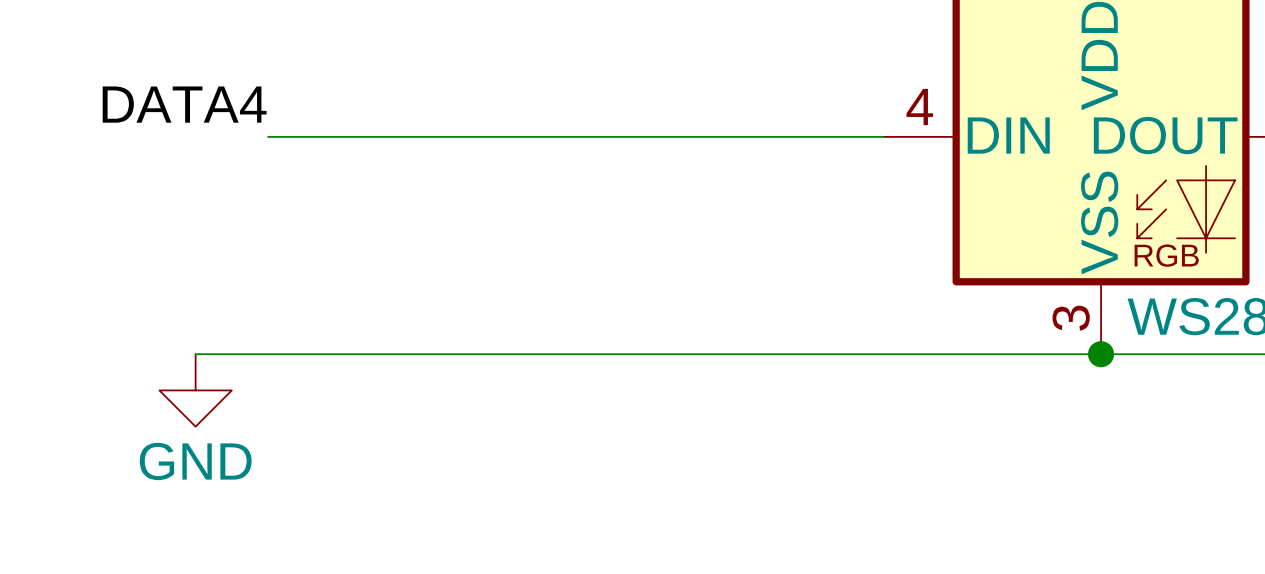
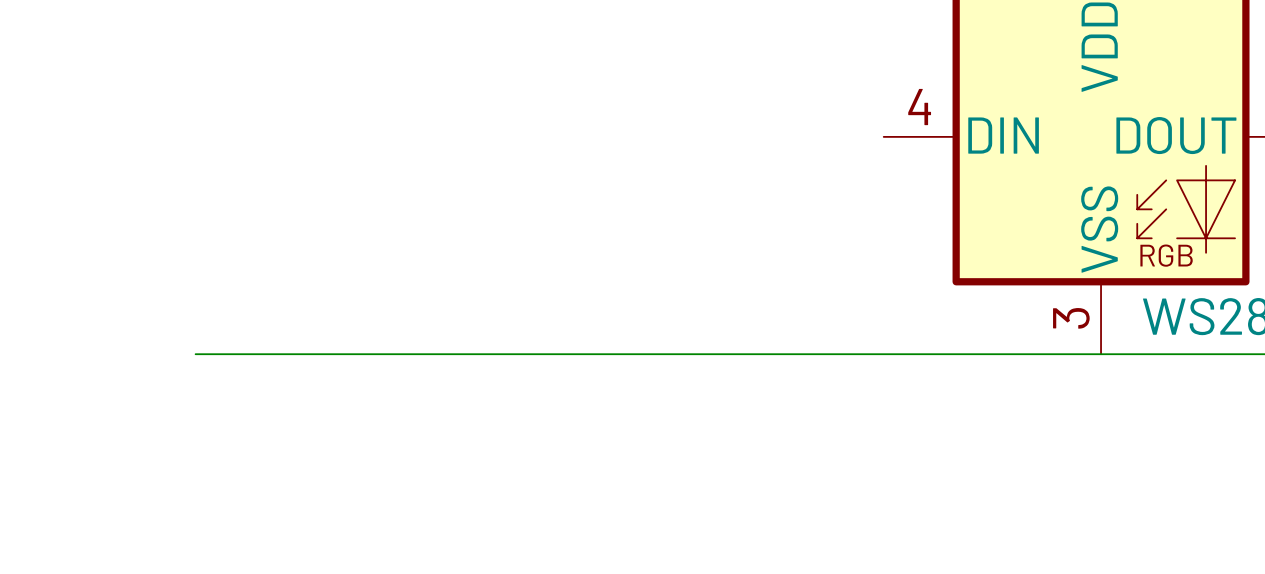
label: DATA4 (184, 104) -> none
wire: (268, 136) (883, 136) -> none
junction: (1101, 354) -> none
power symbol: GND (195, 390) -> none

